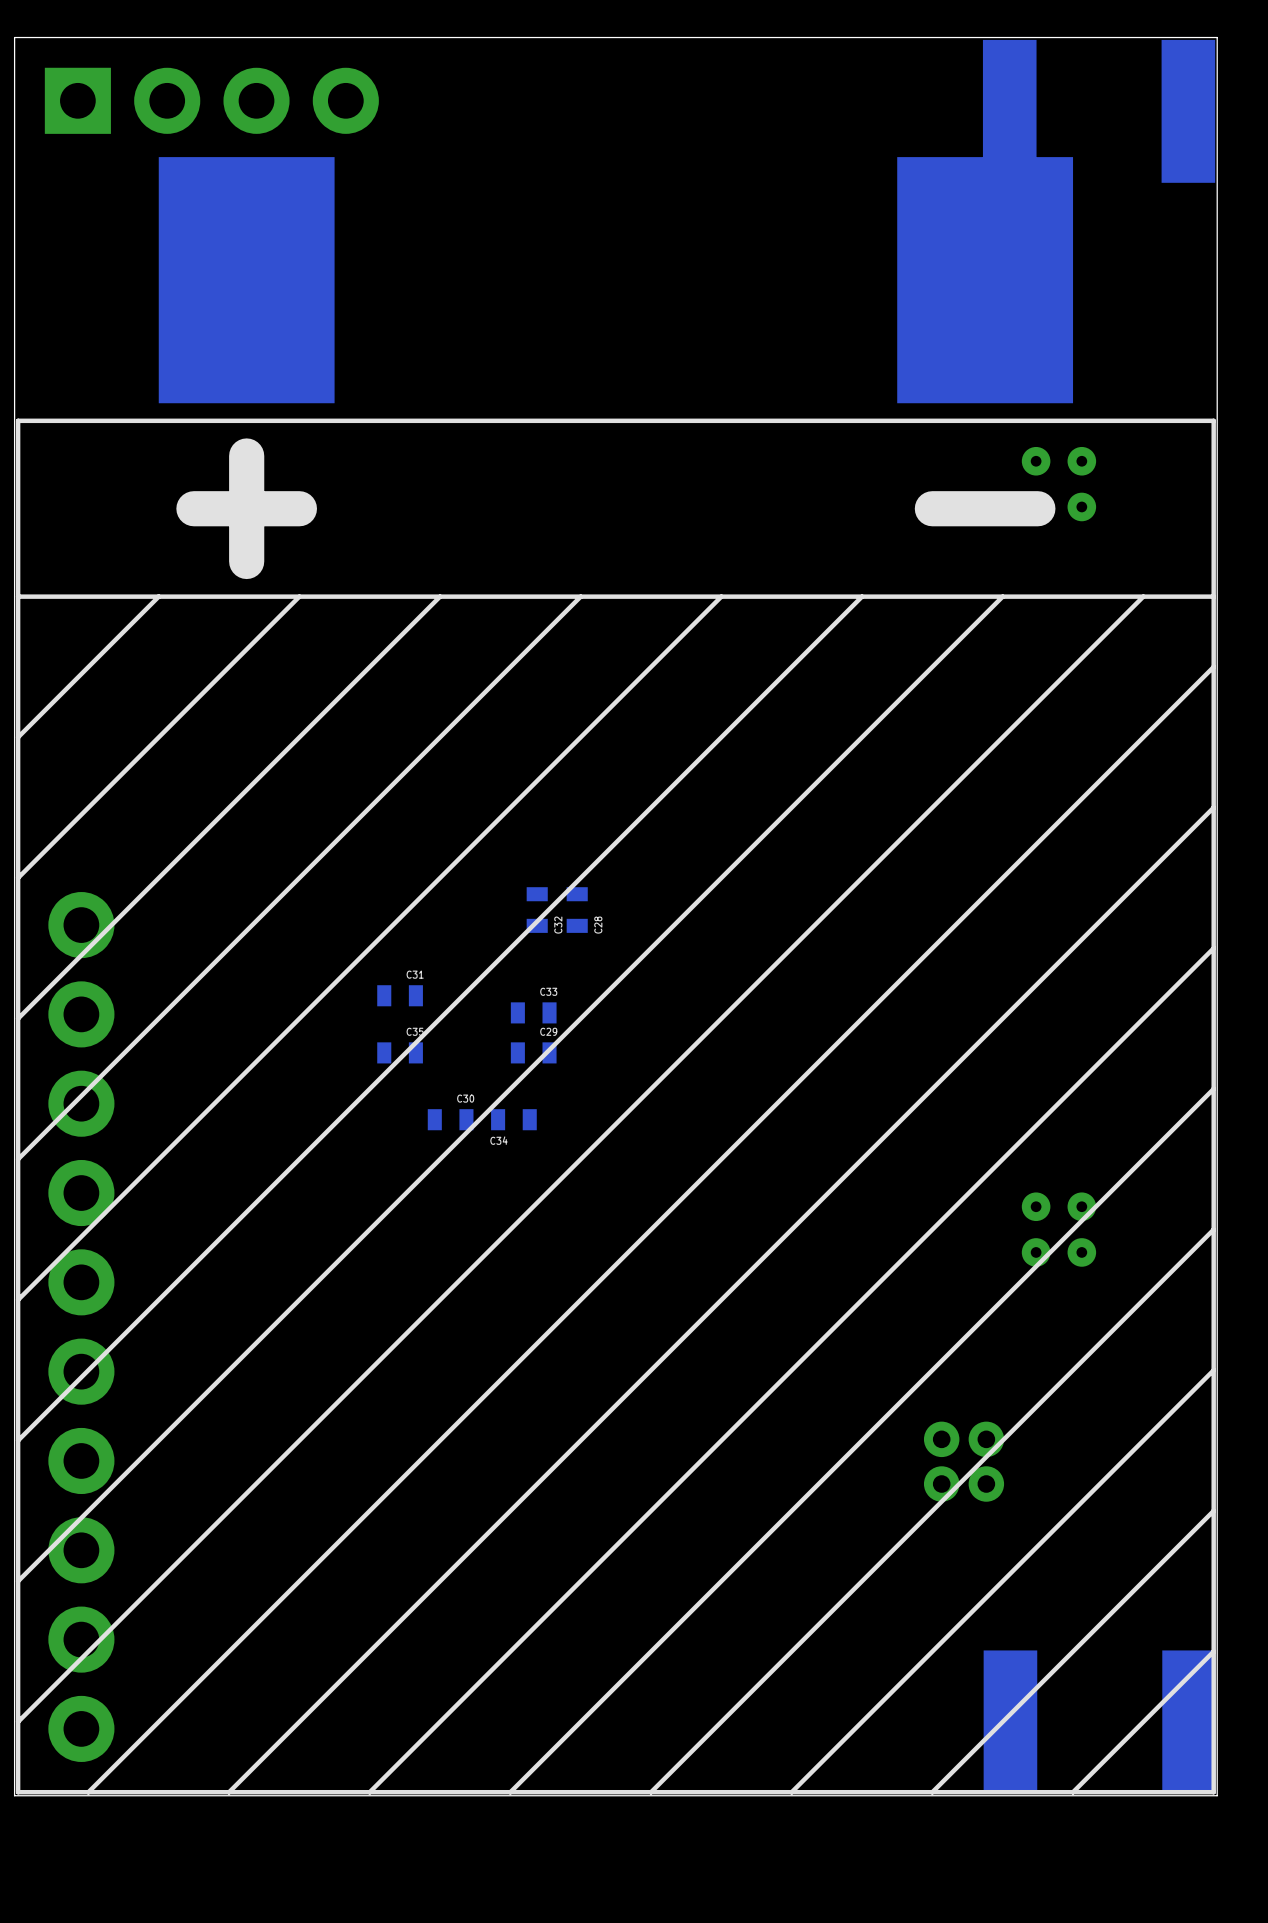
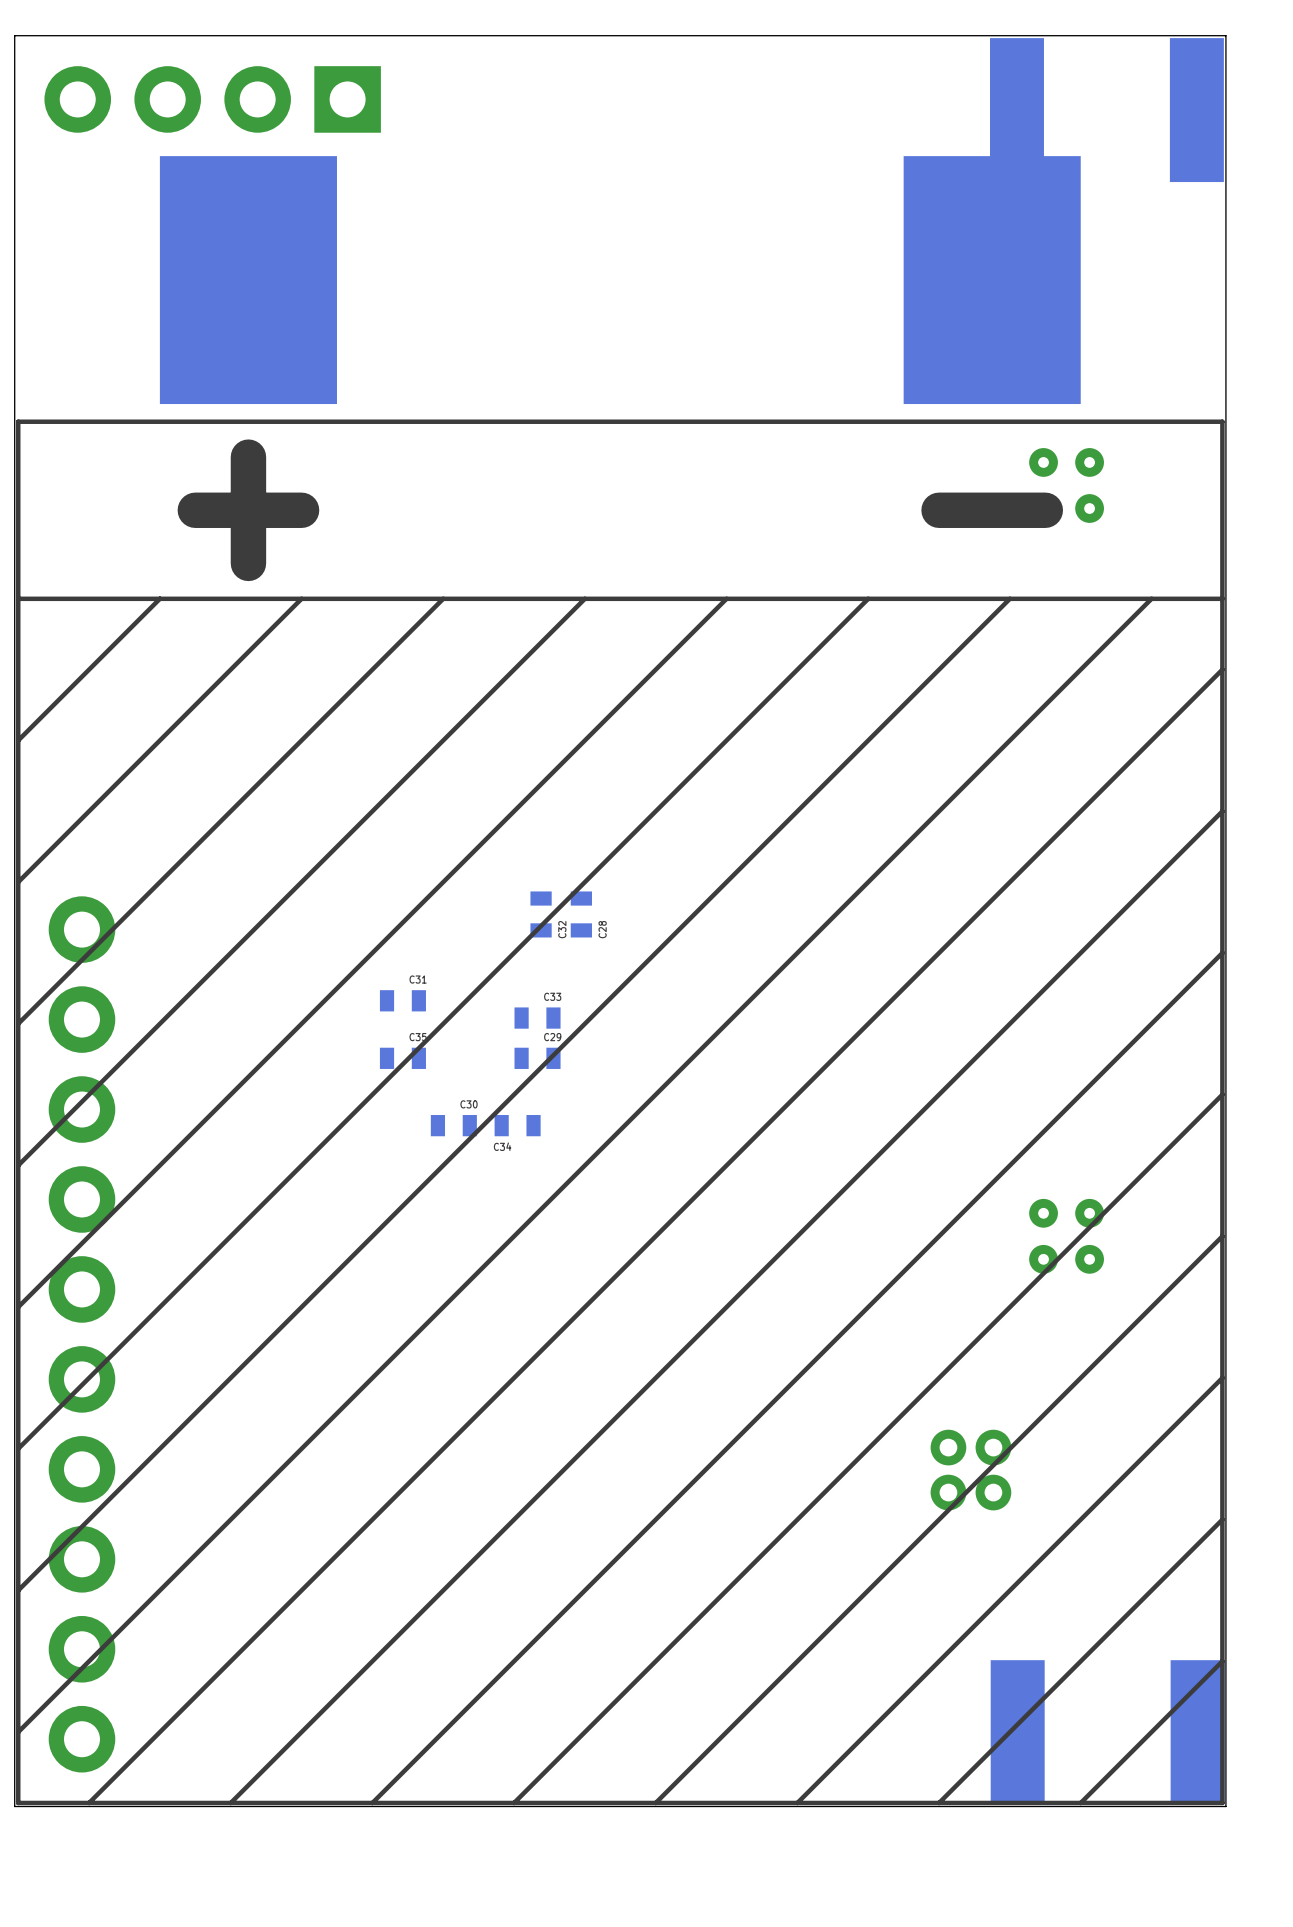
part rotation: 0° (211, 100) -> 180° (212, 99)

